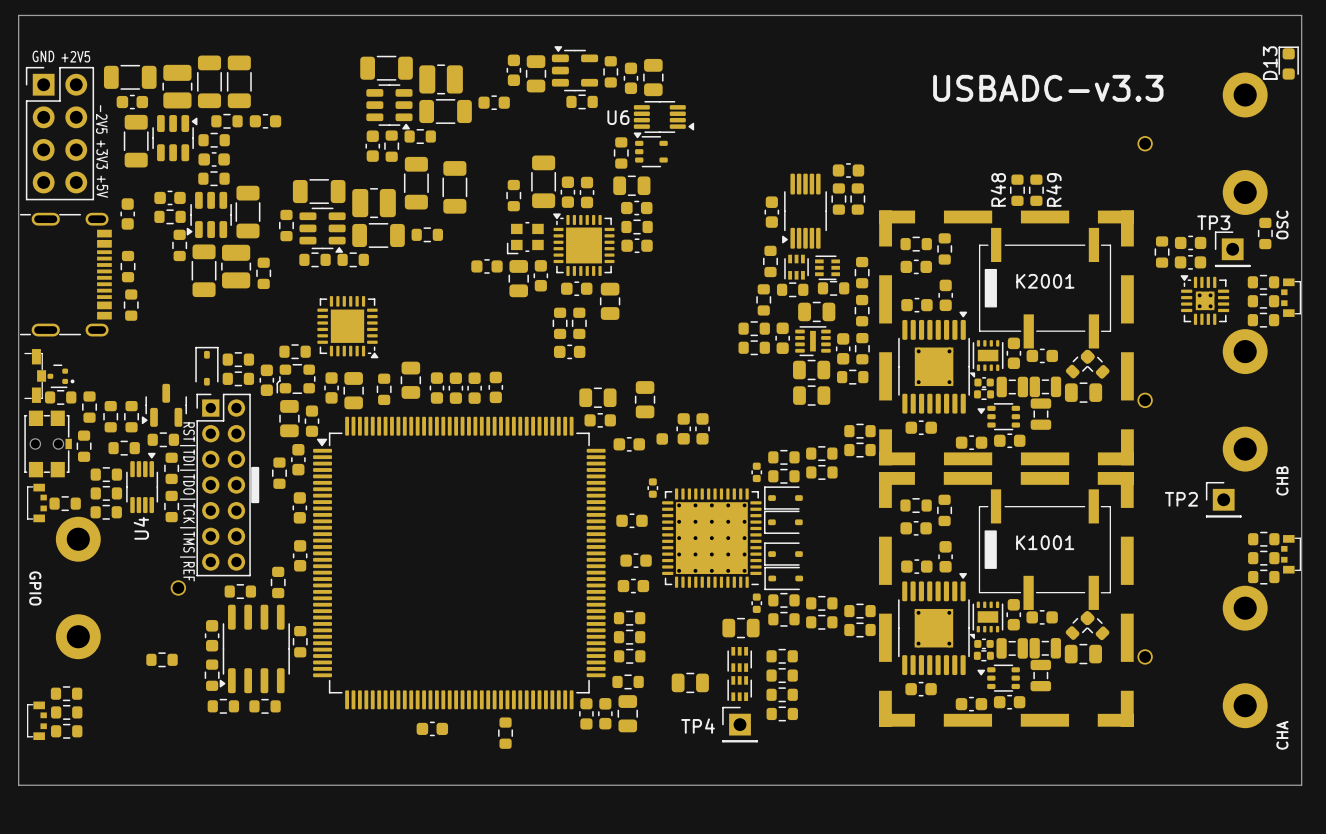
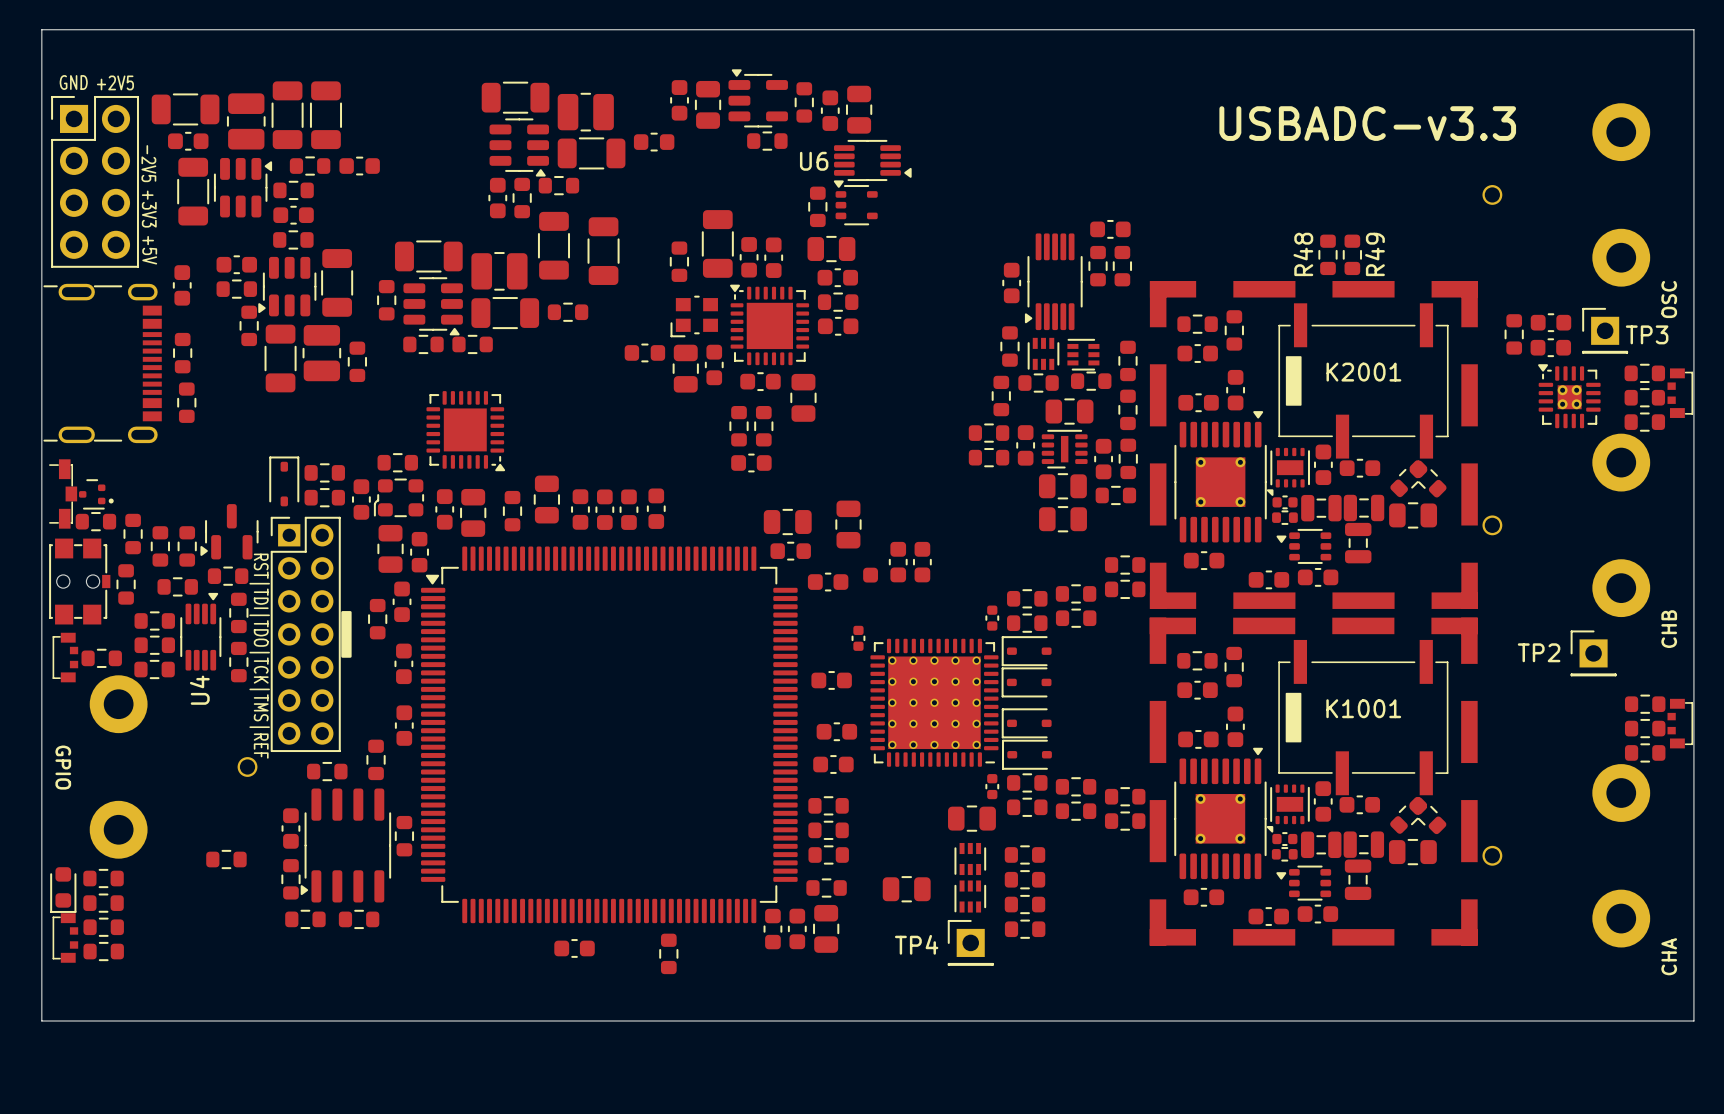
D13: (1288, 63) -> none
TP3 name position: TP3 (1213, 222) -> TP3 (1647, 334)
part: (1265, 233) -> none
part: none -> (103, 878)
part: none -> (63, 890)

